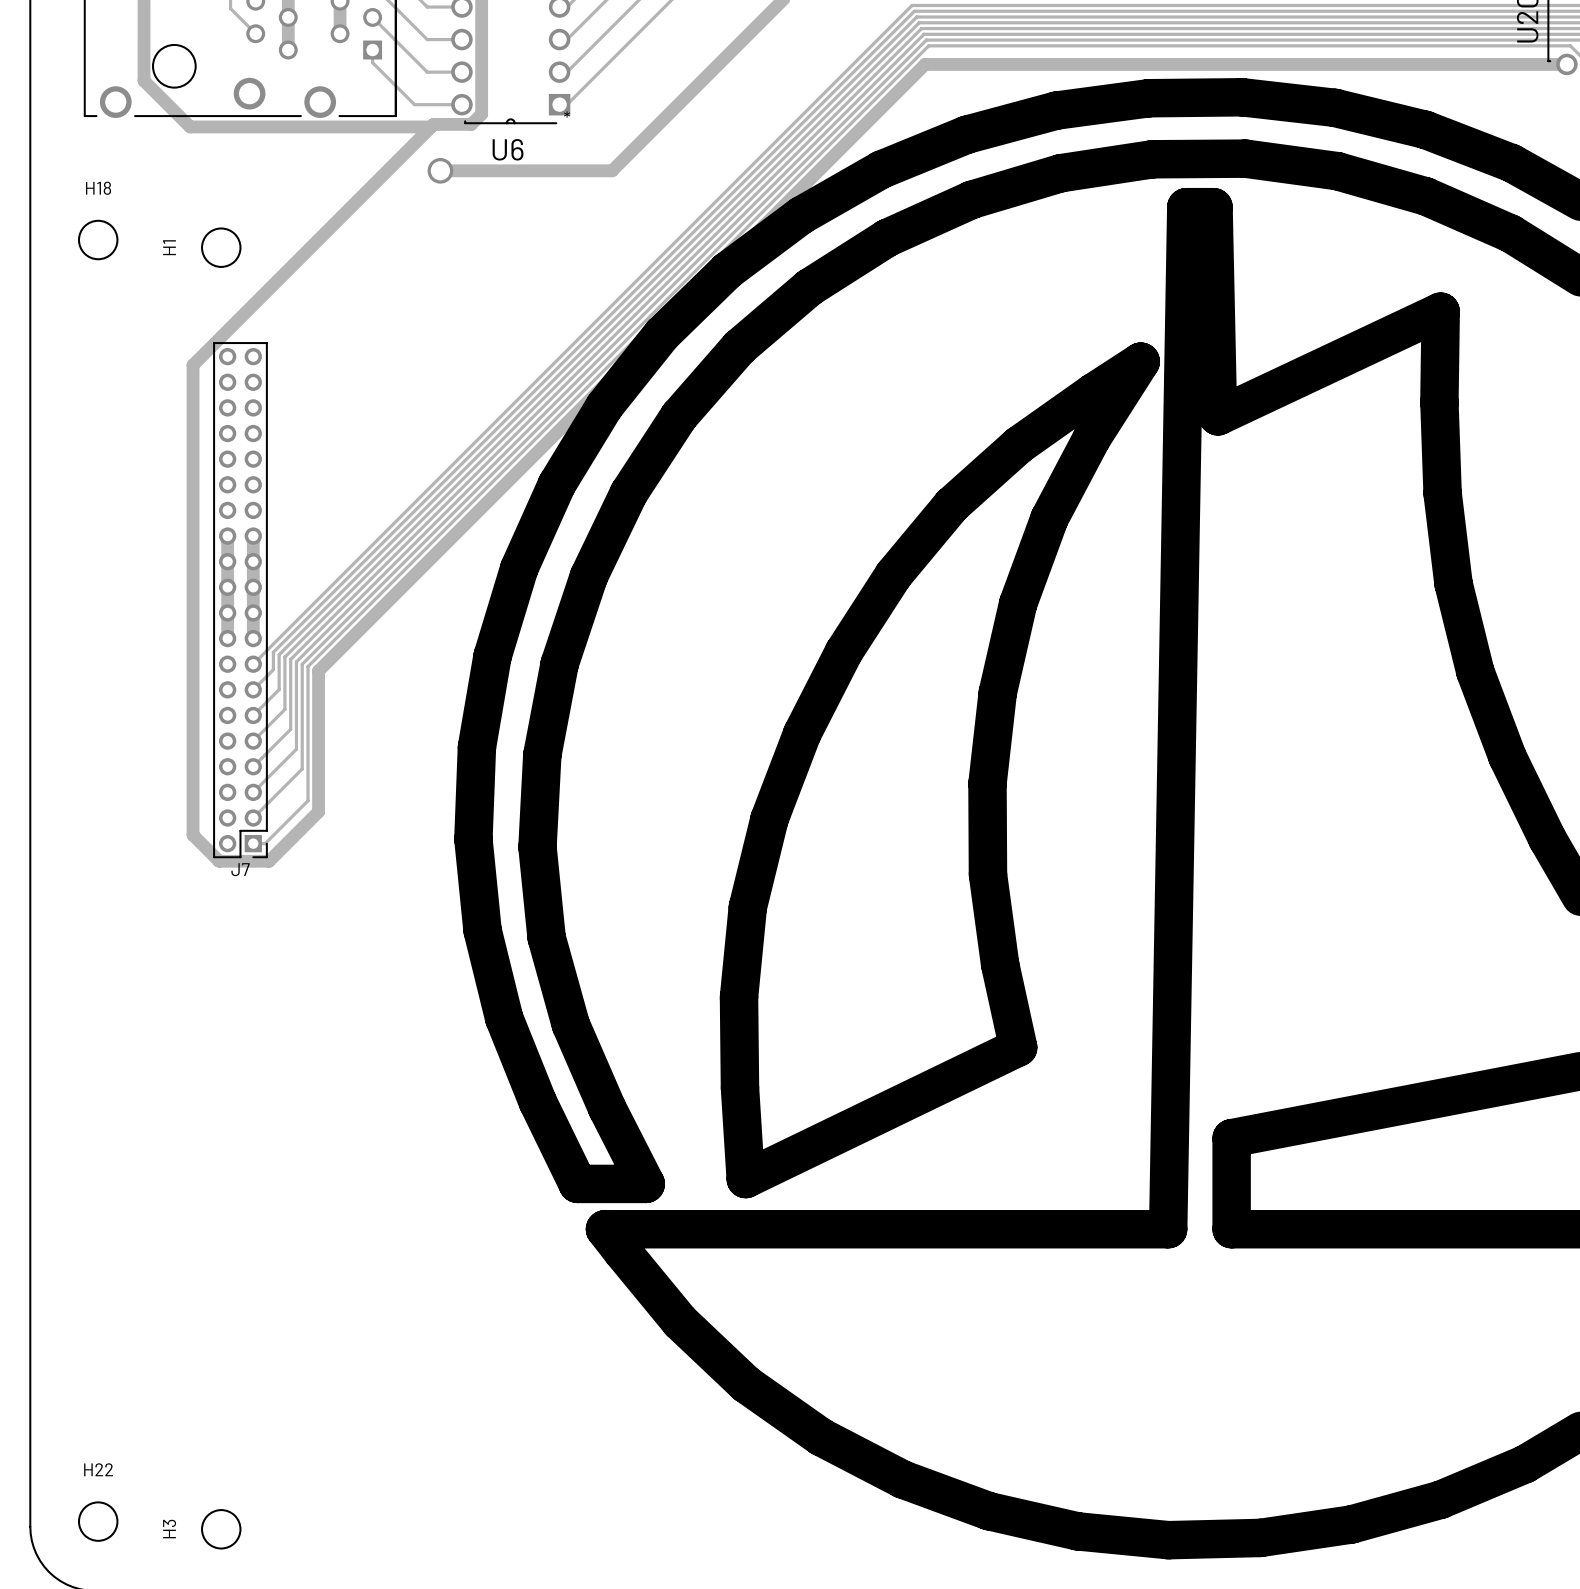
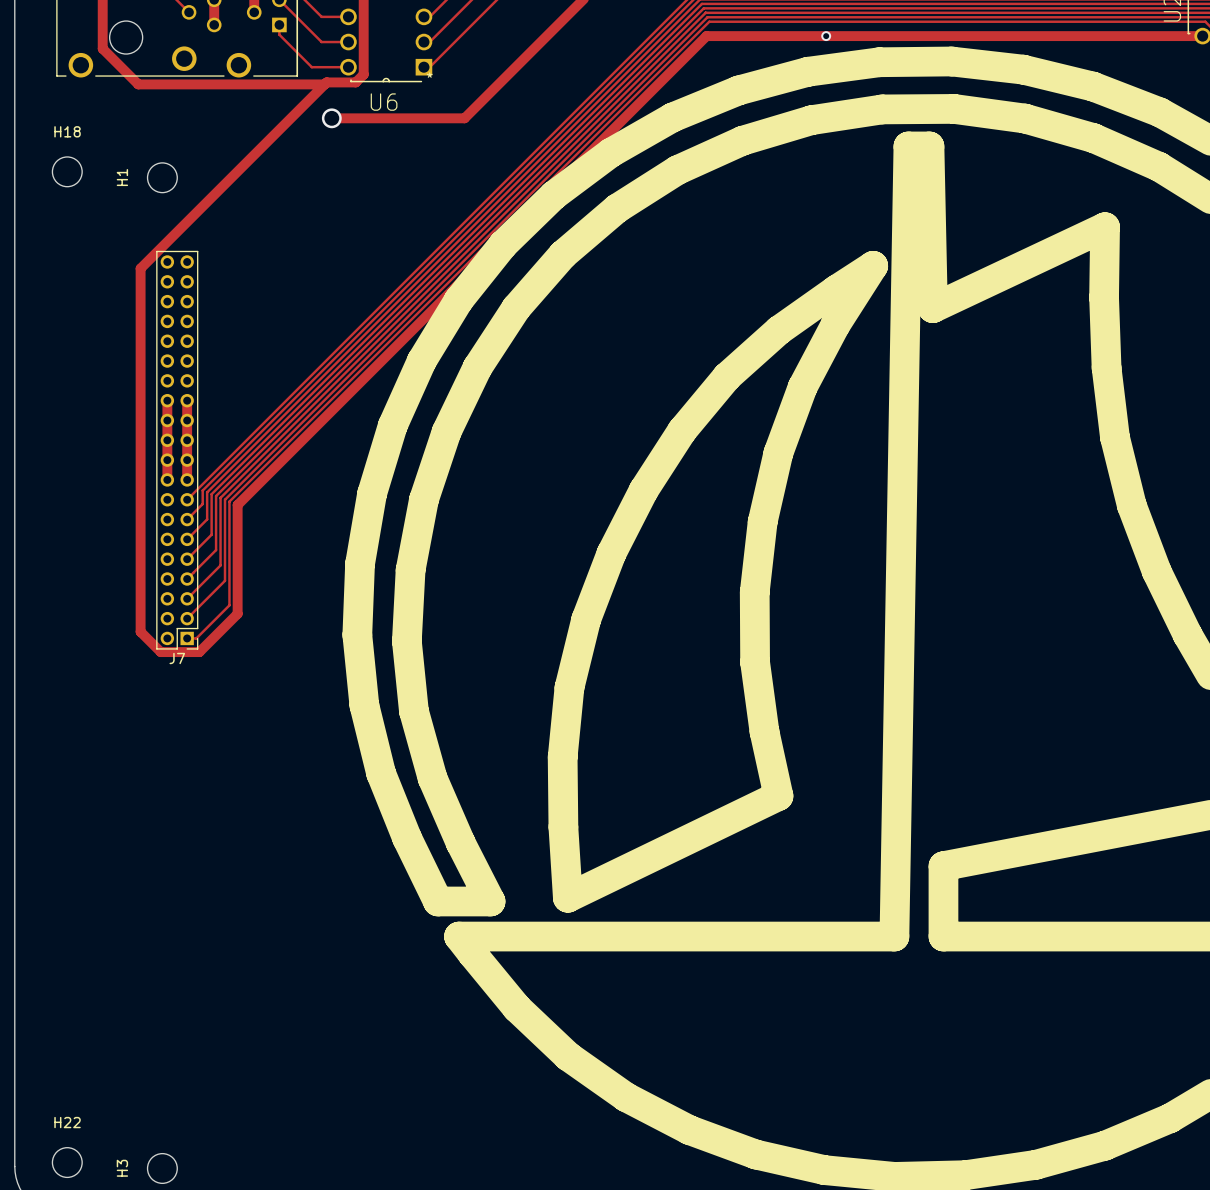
via: none -> (826, 36)

